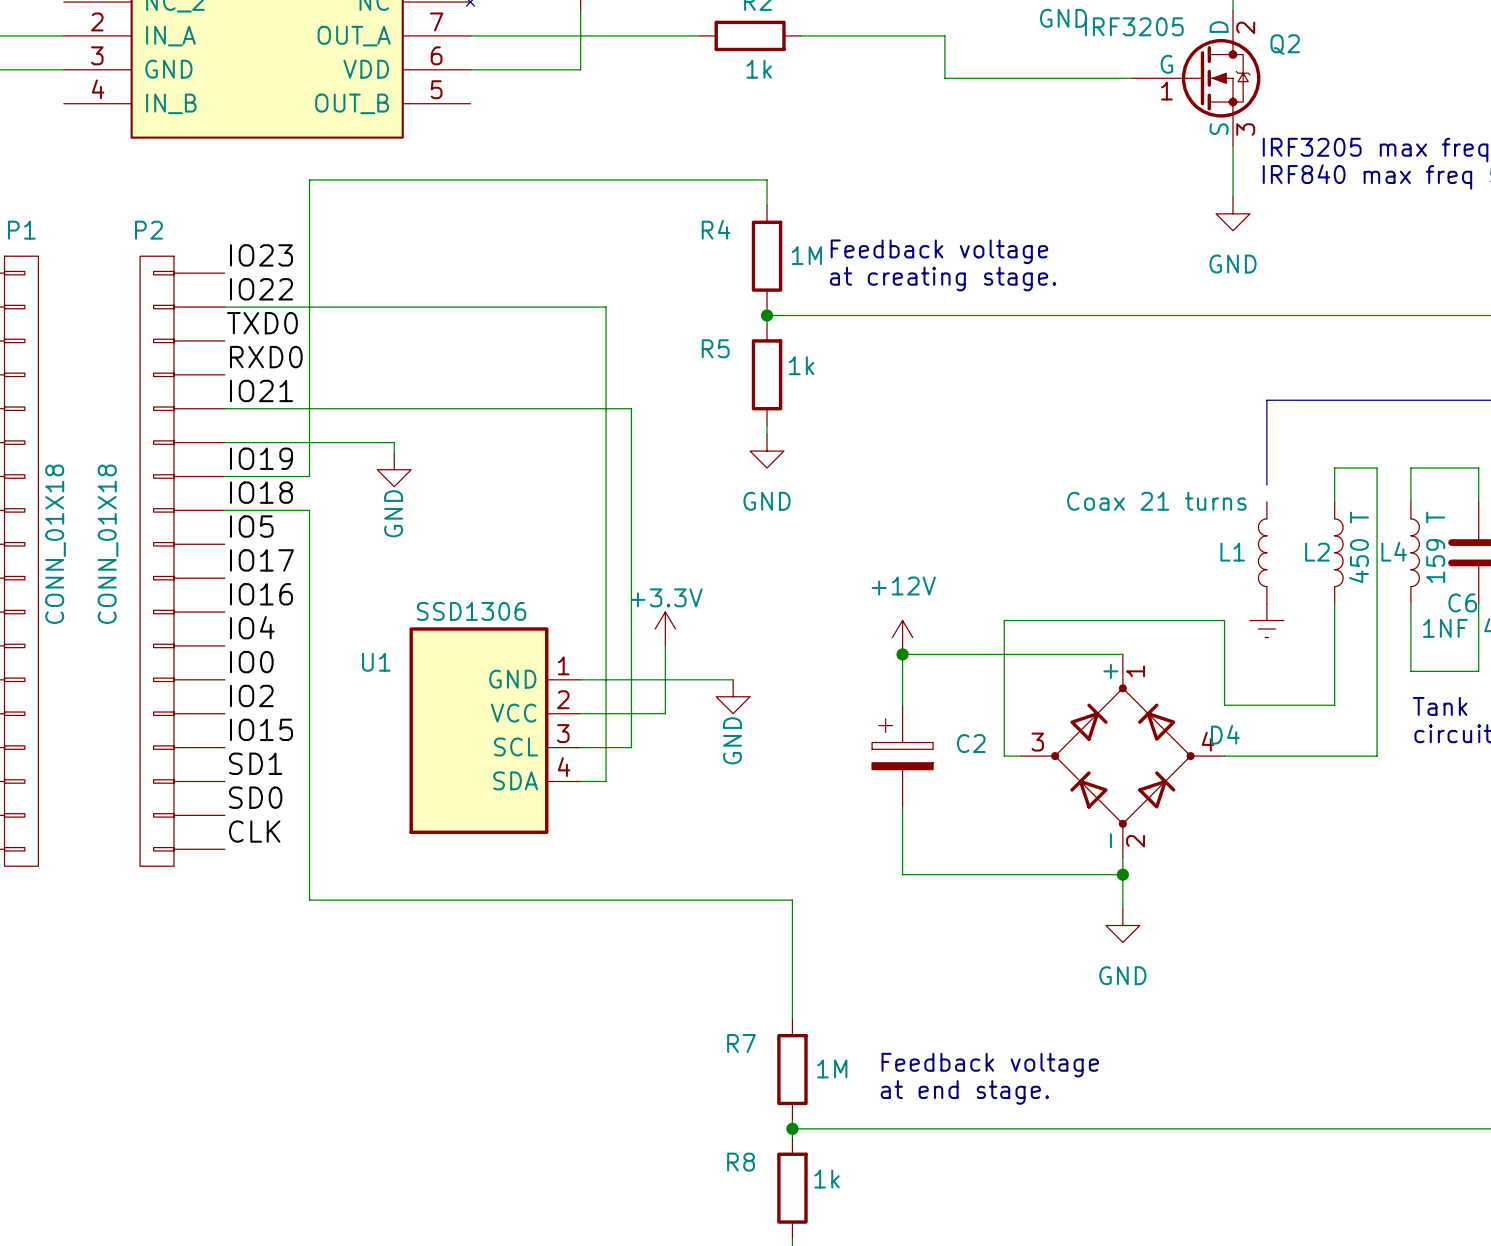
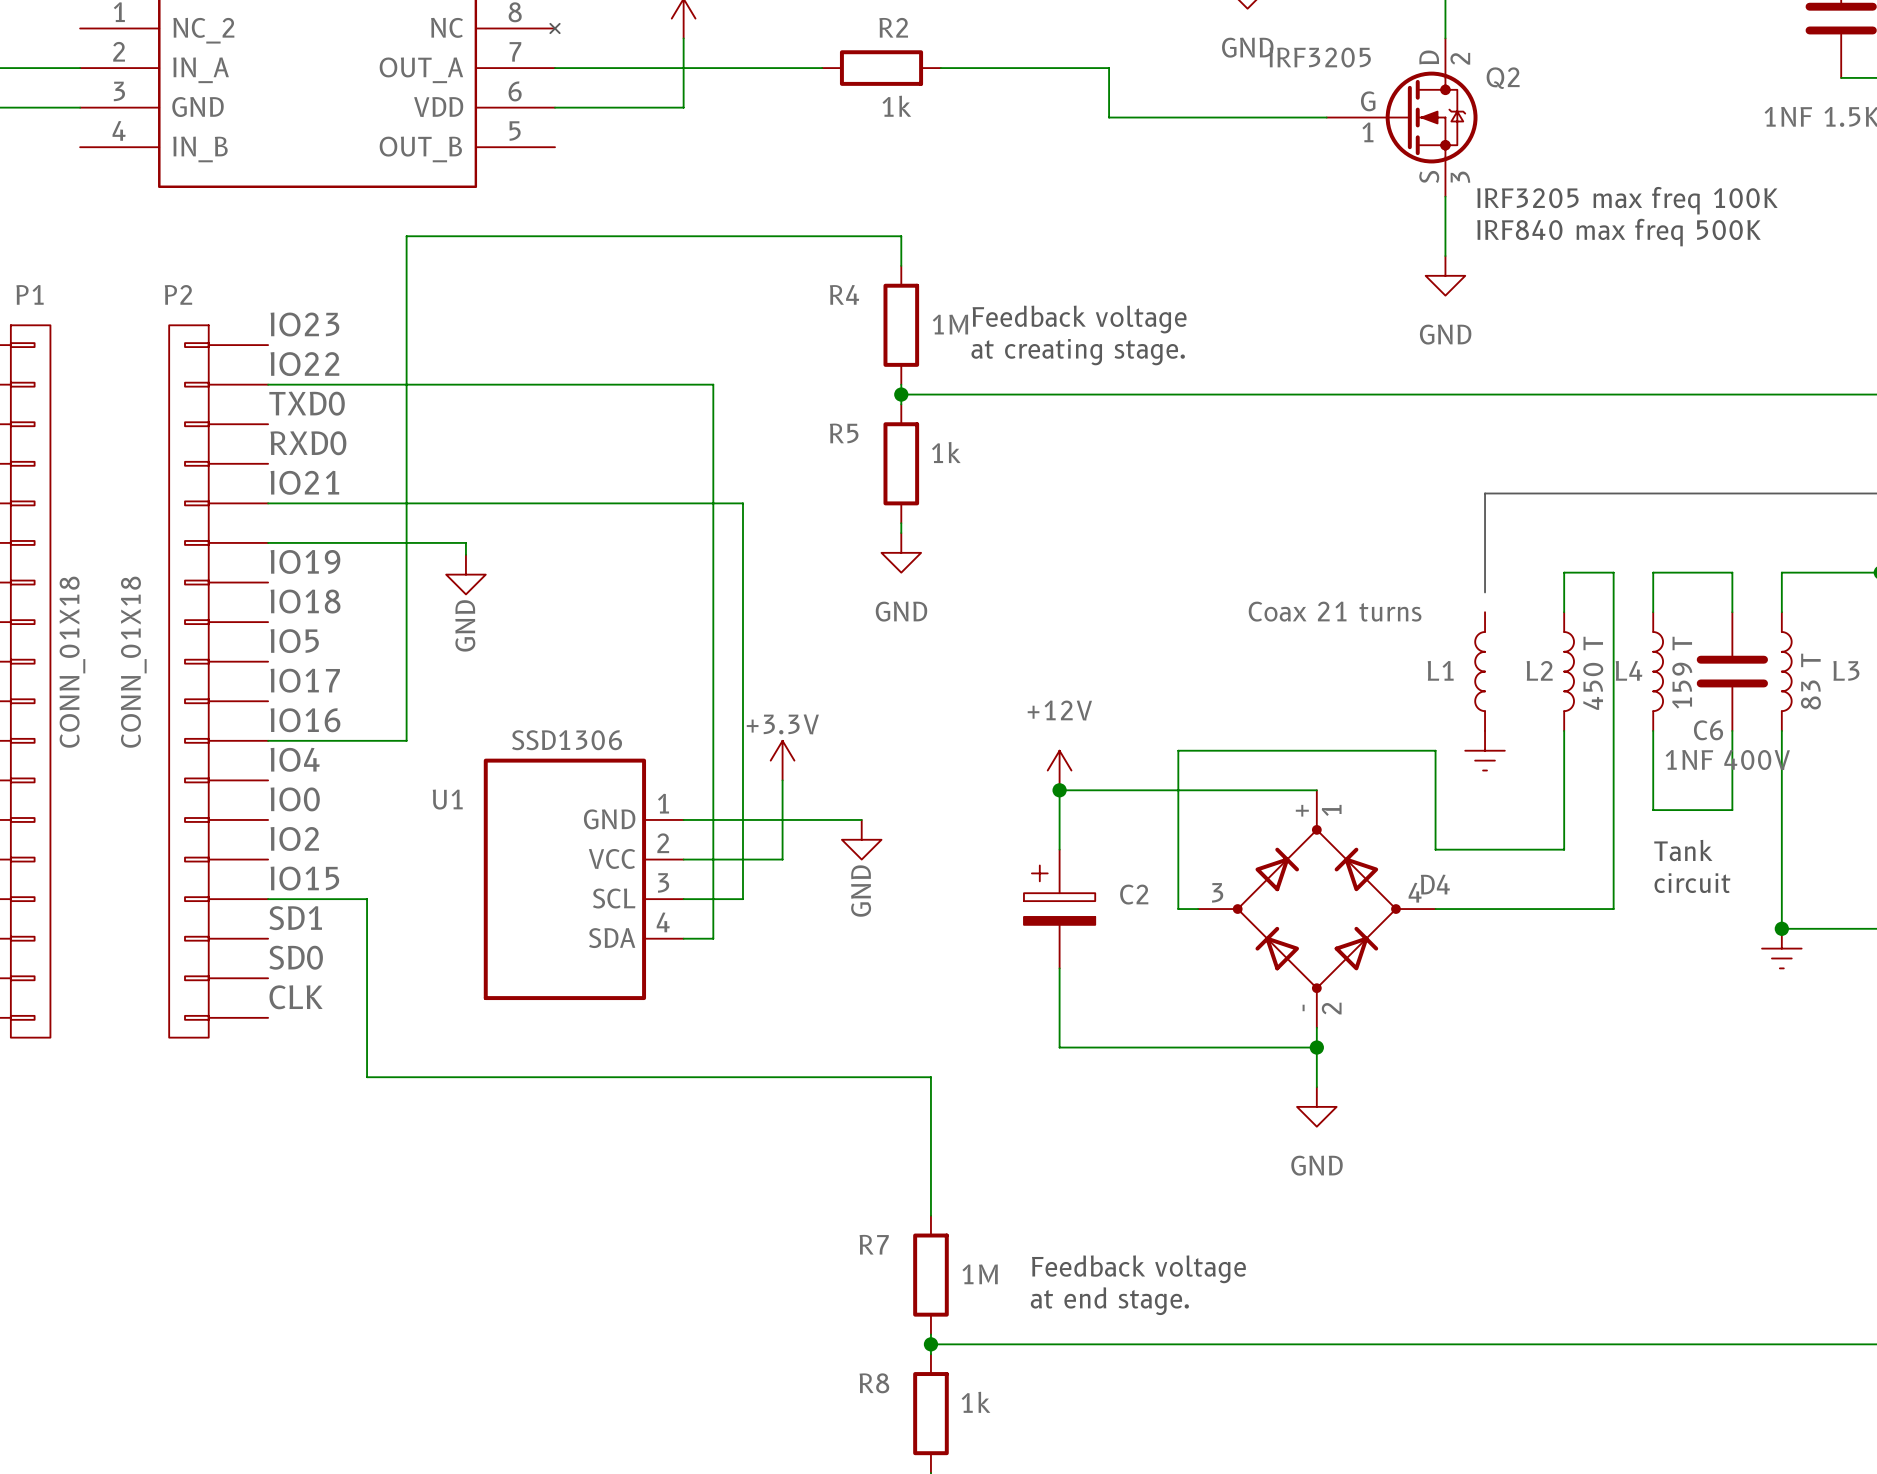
wire: (343, 179) (309, 179) (309, 476) (224, 476) -> (406, 236) (406, 740) (268, 740)
wire: (224, 510) (309, 510) (309, 747) -> (268, 899) (367, 899)

